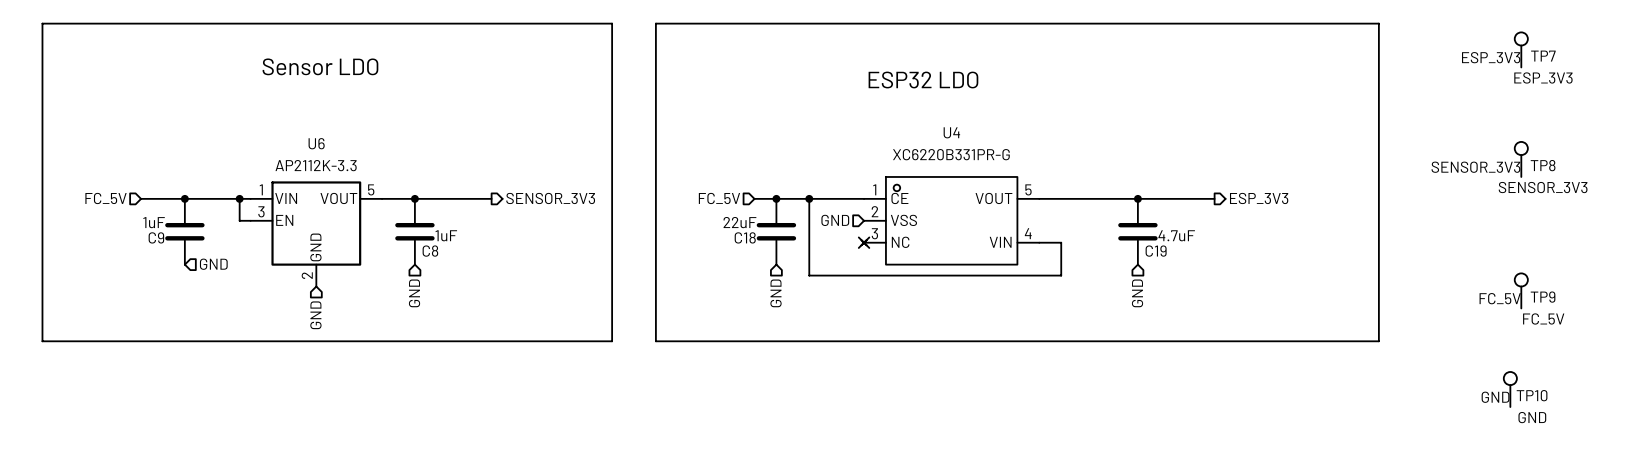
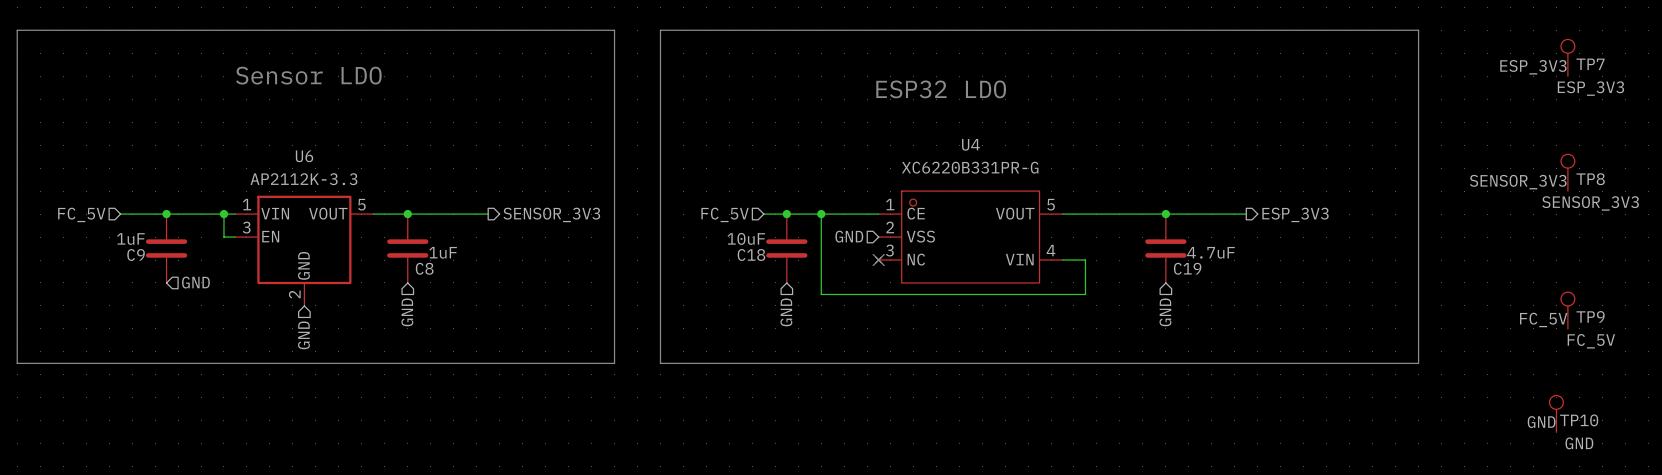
C18 value: 22uF (739, 222) -> 10uF (746, 238)

